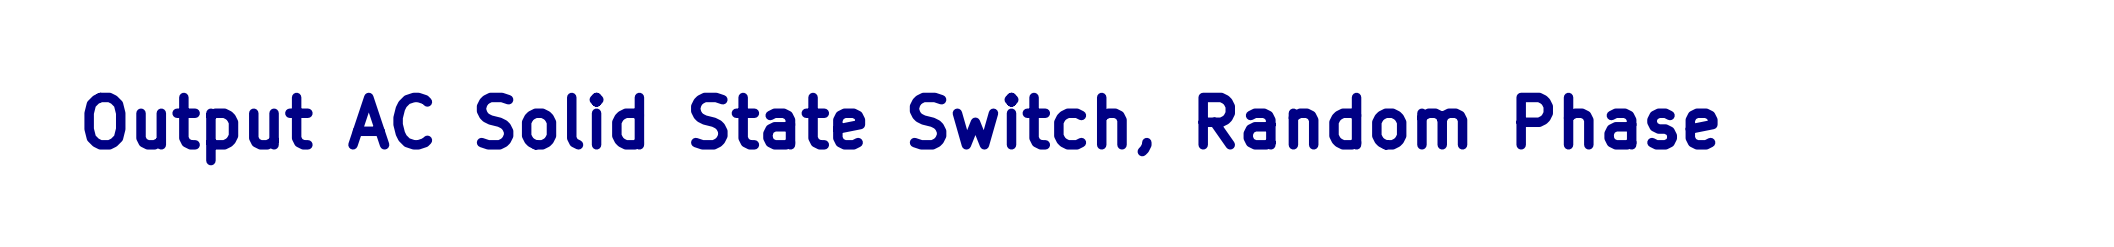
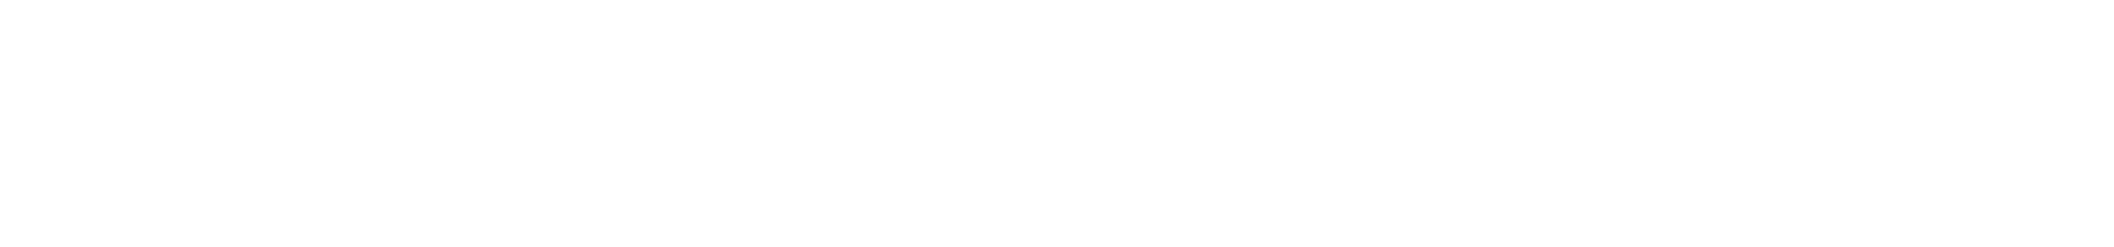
text: Output AC Solid State Switch, Random Phase (901, 129) -> none

